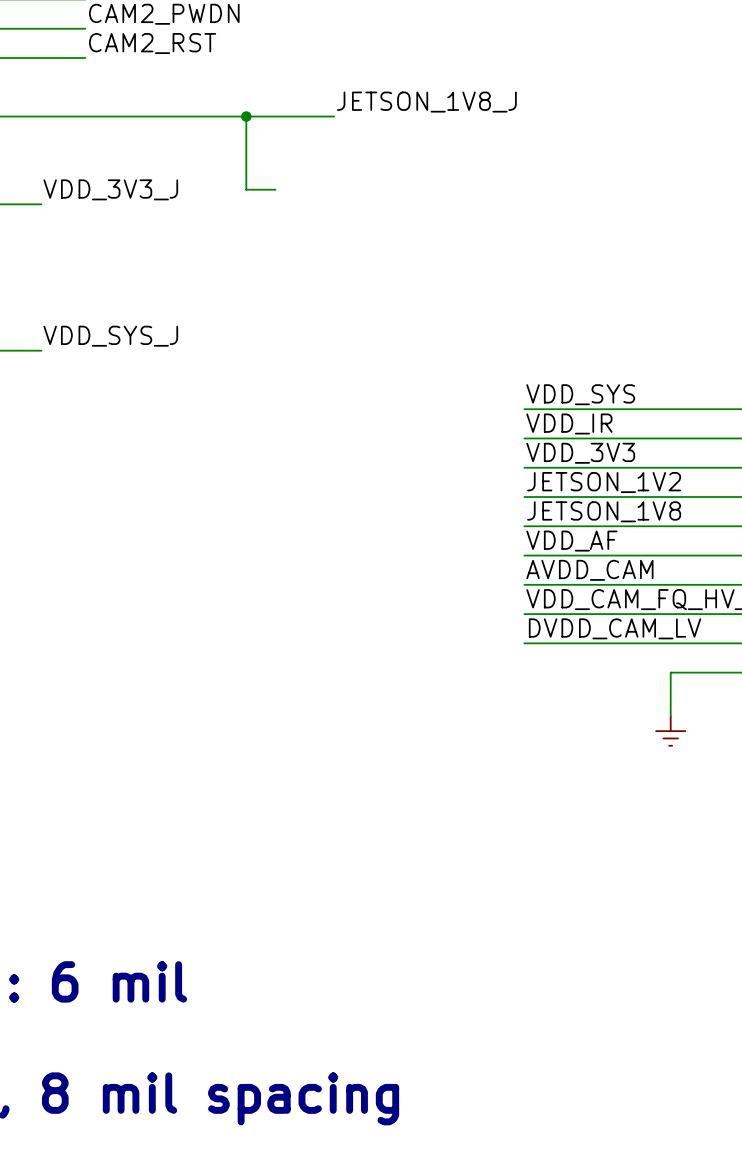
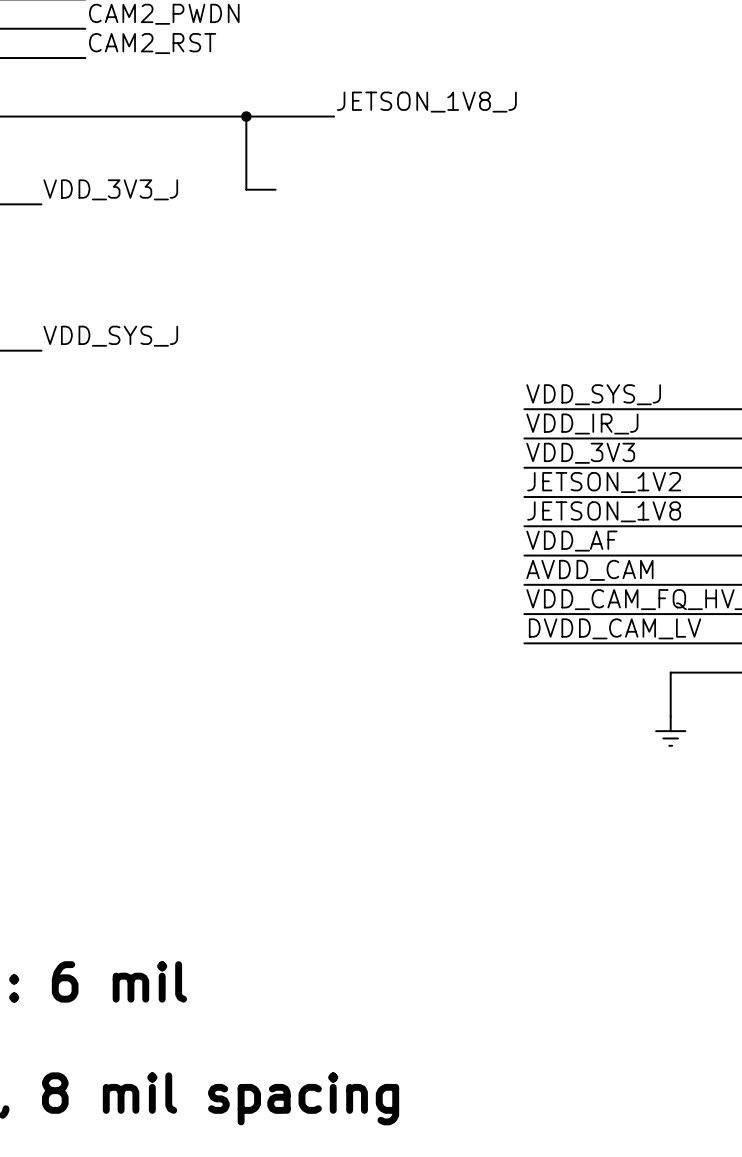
label: VDD_SYS (580, 394) -> VDD_SYS_J (593, 394)
label: VDD_IR (569, 423) -> VDD_IR_J (582, 423)

